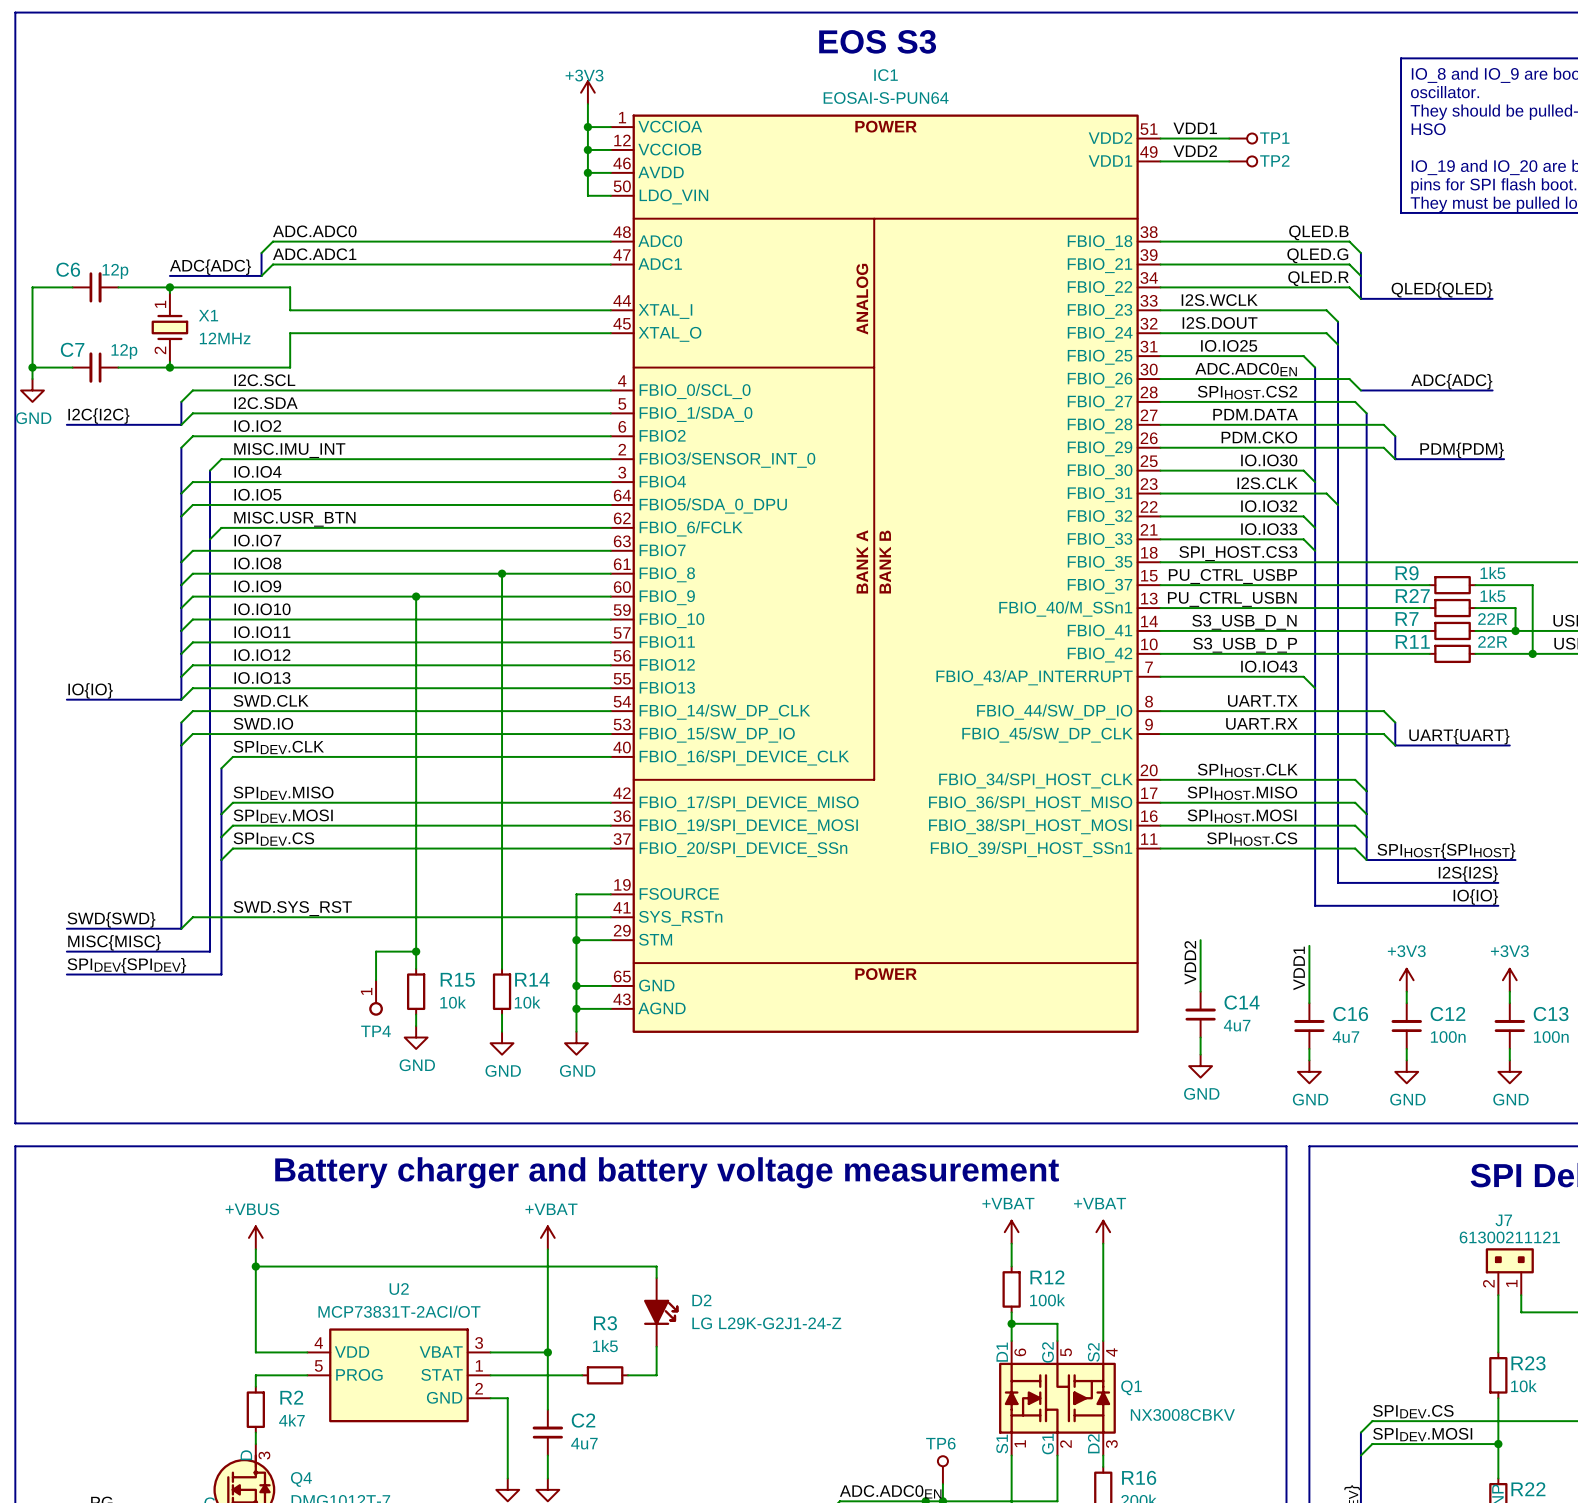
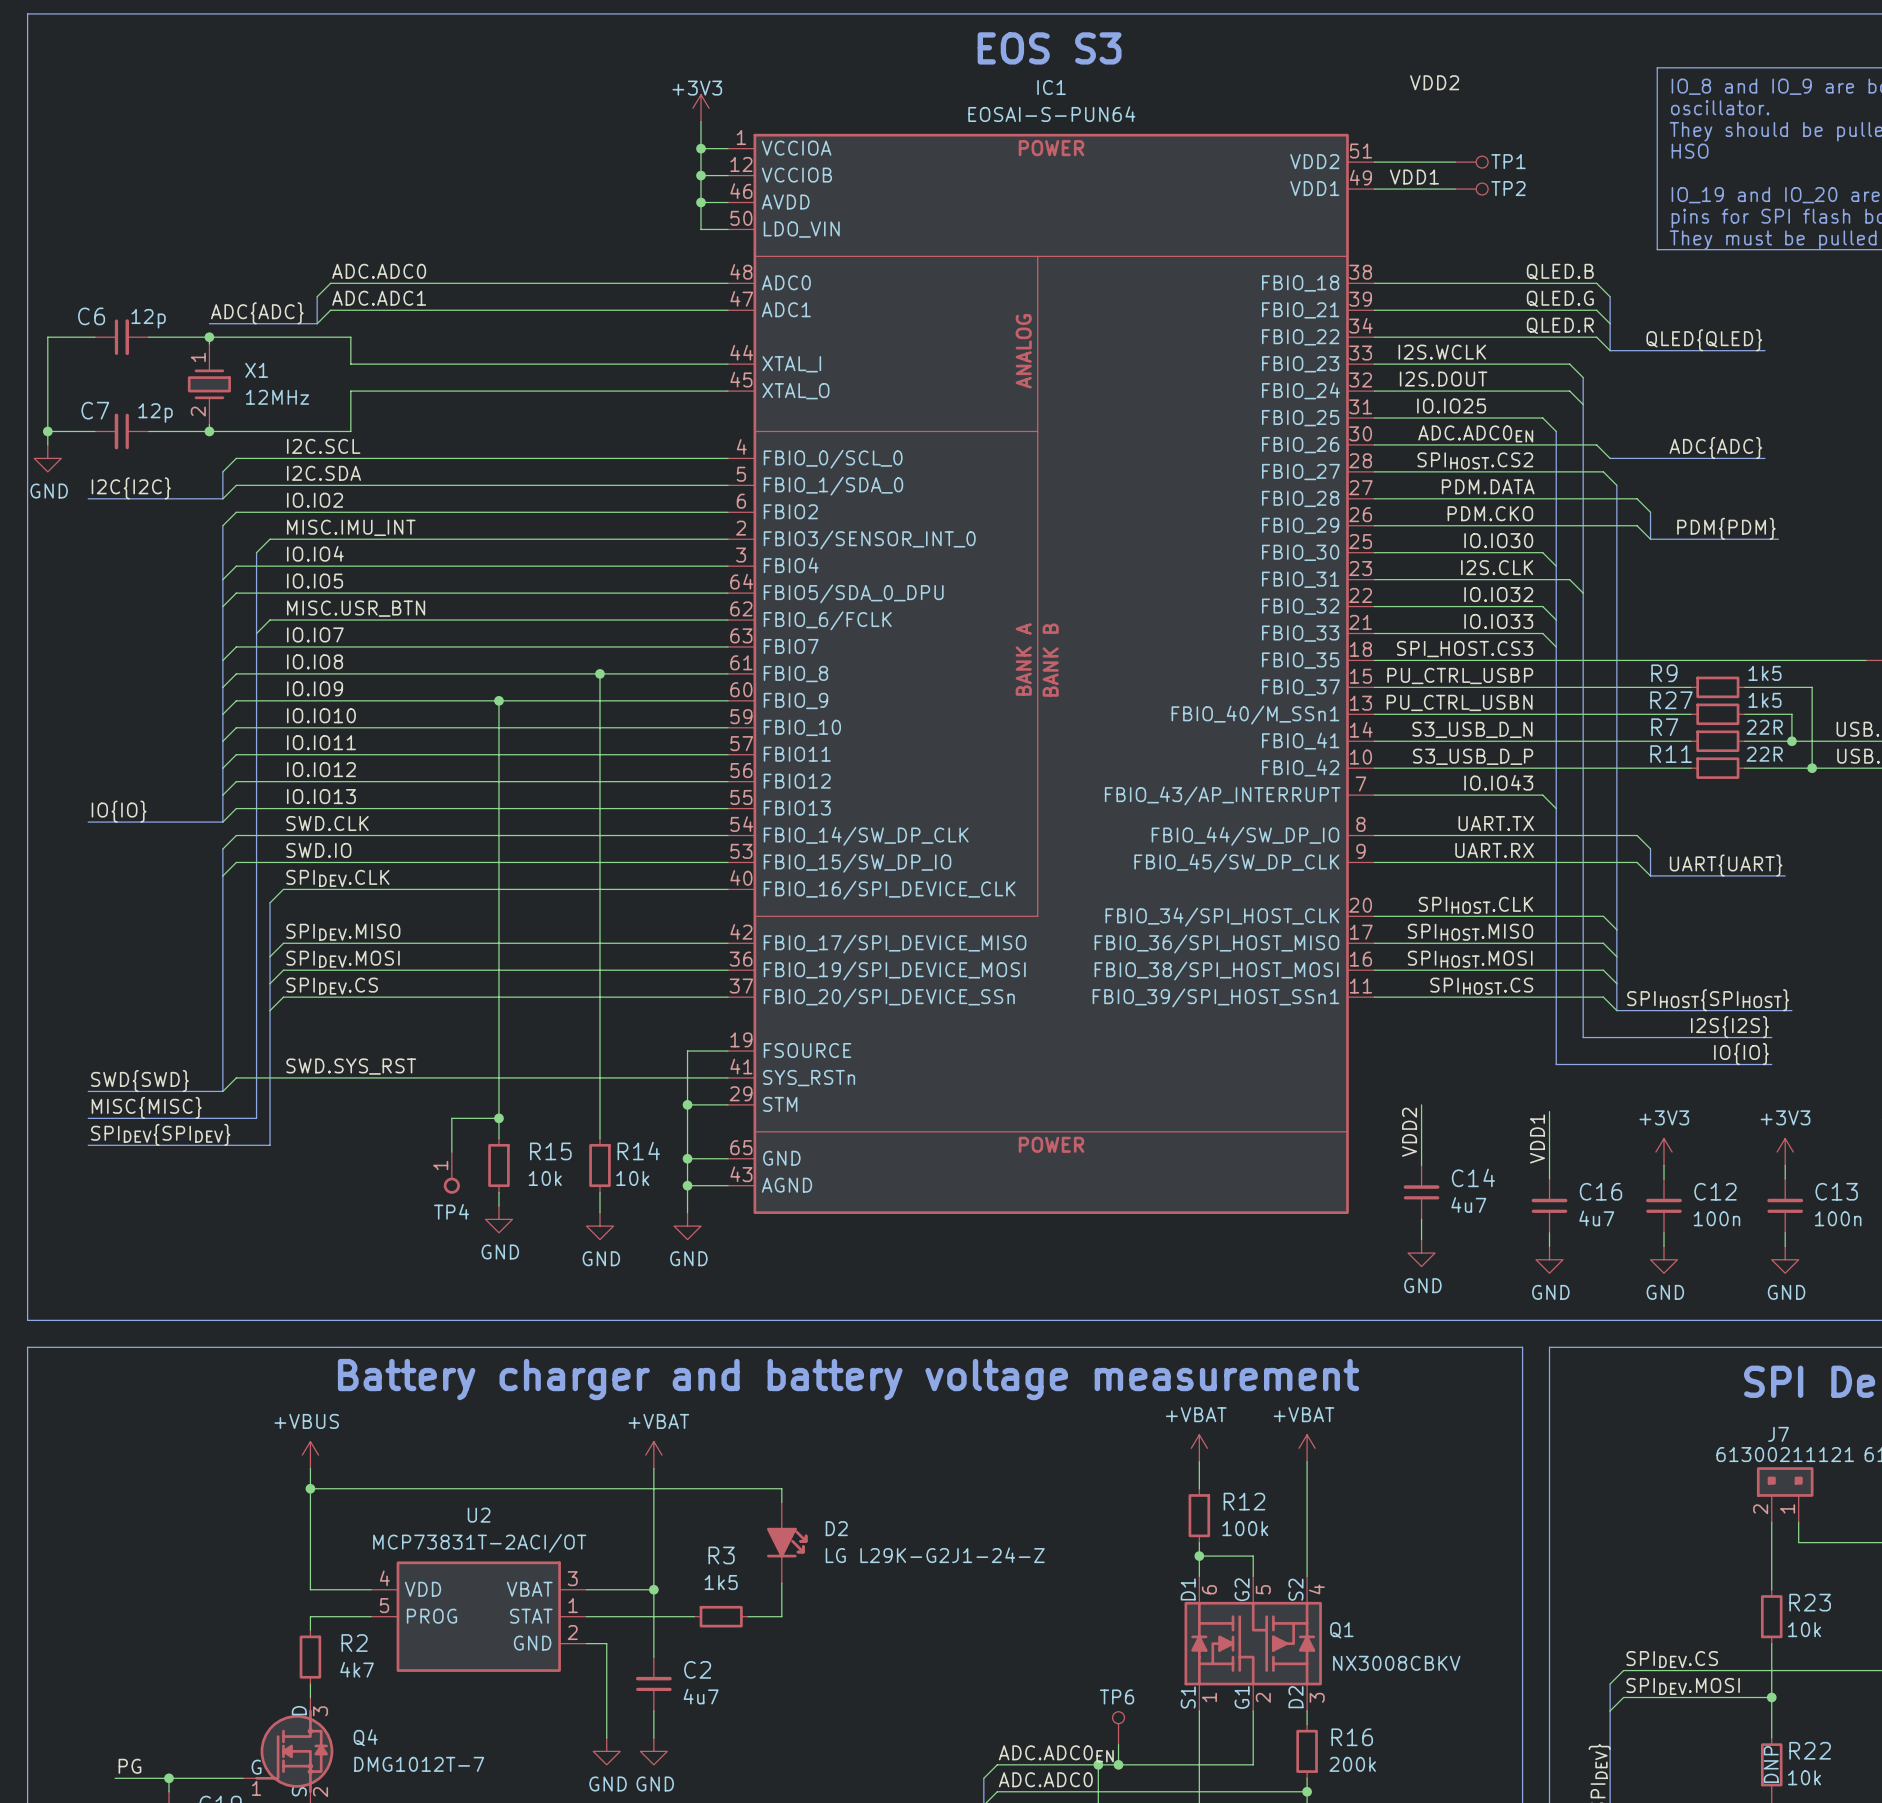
label: none -> VDD2 (1434, 82)
label: VDD1 (1195, 128) -> none
label: VDD2 (1195, 151) -> VDD1 (1414, 177)

